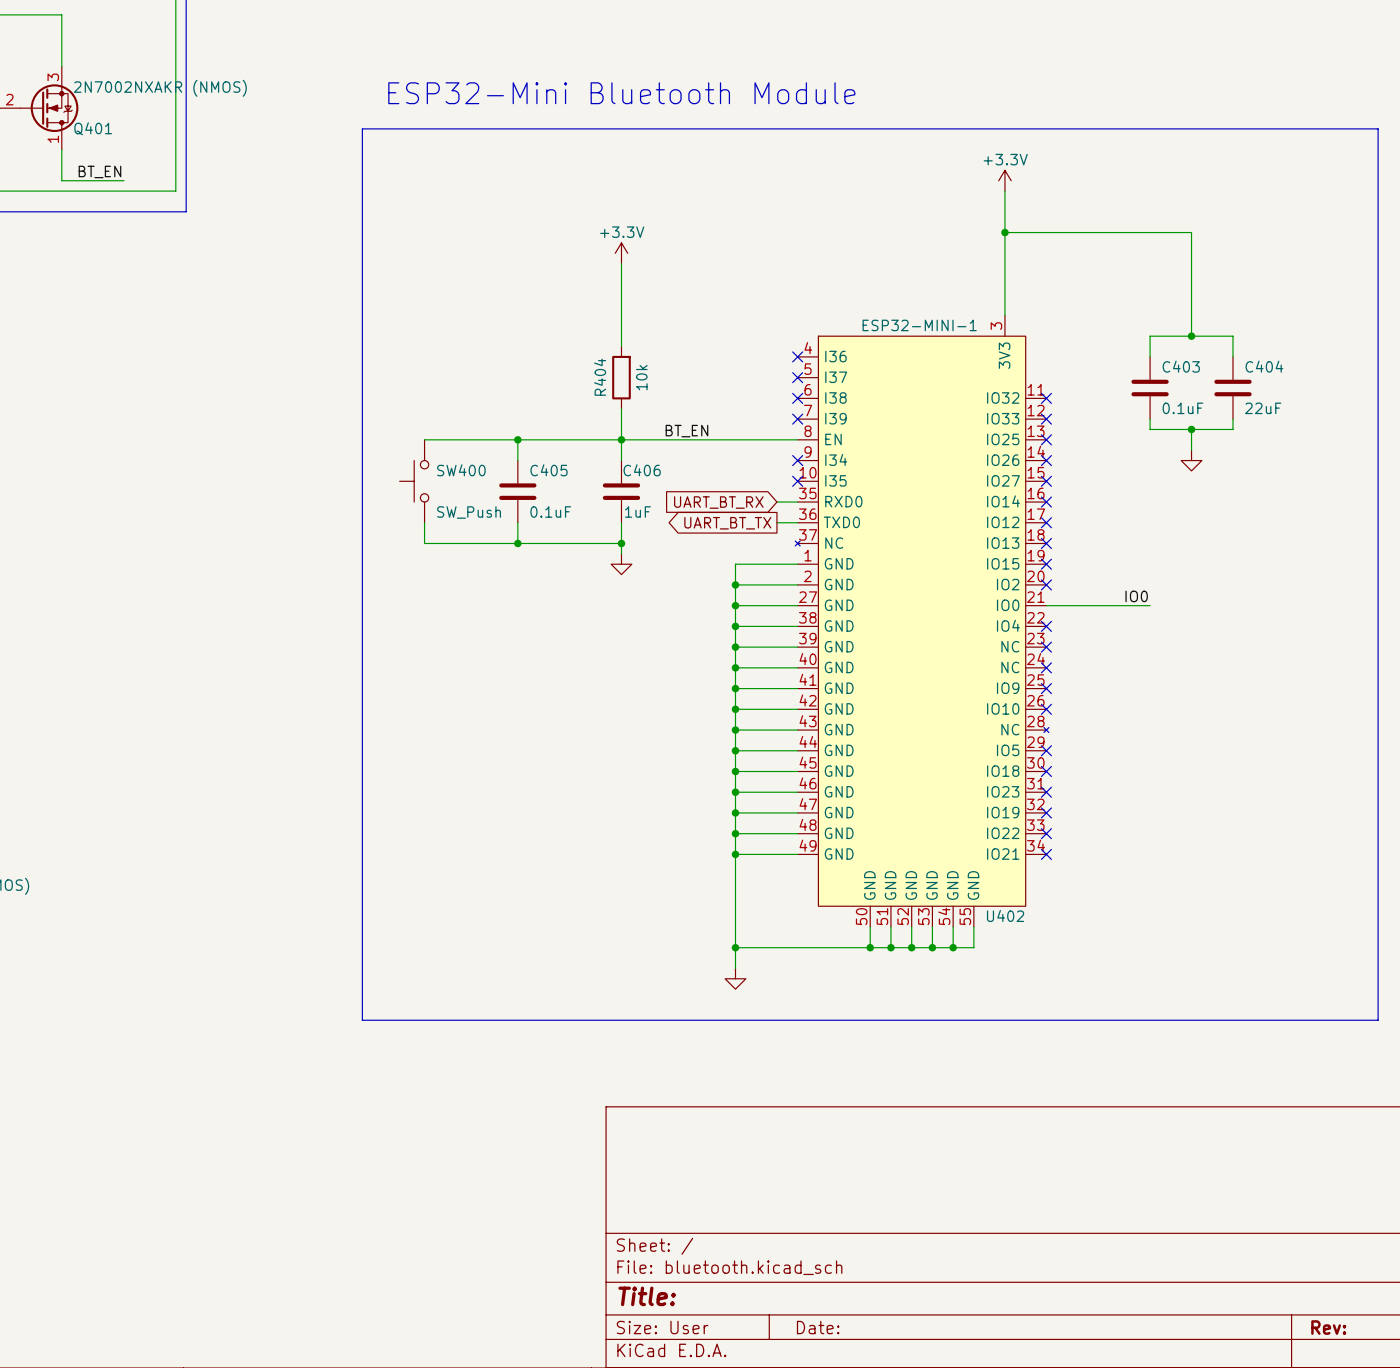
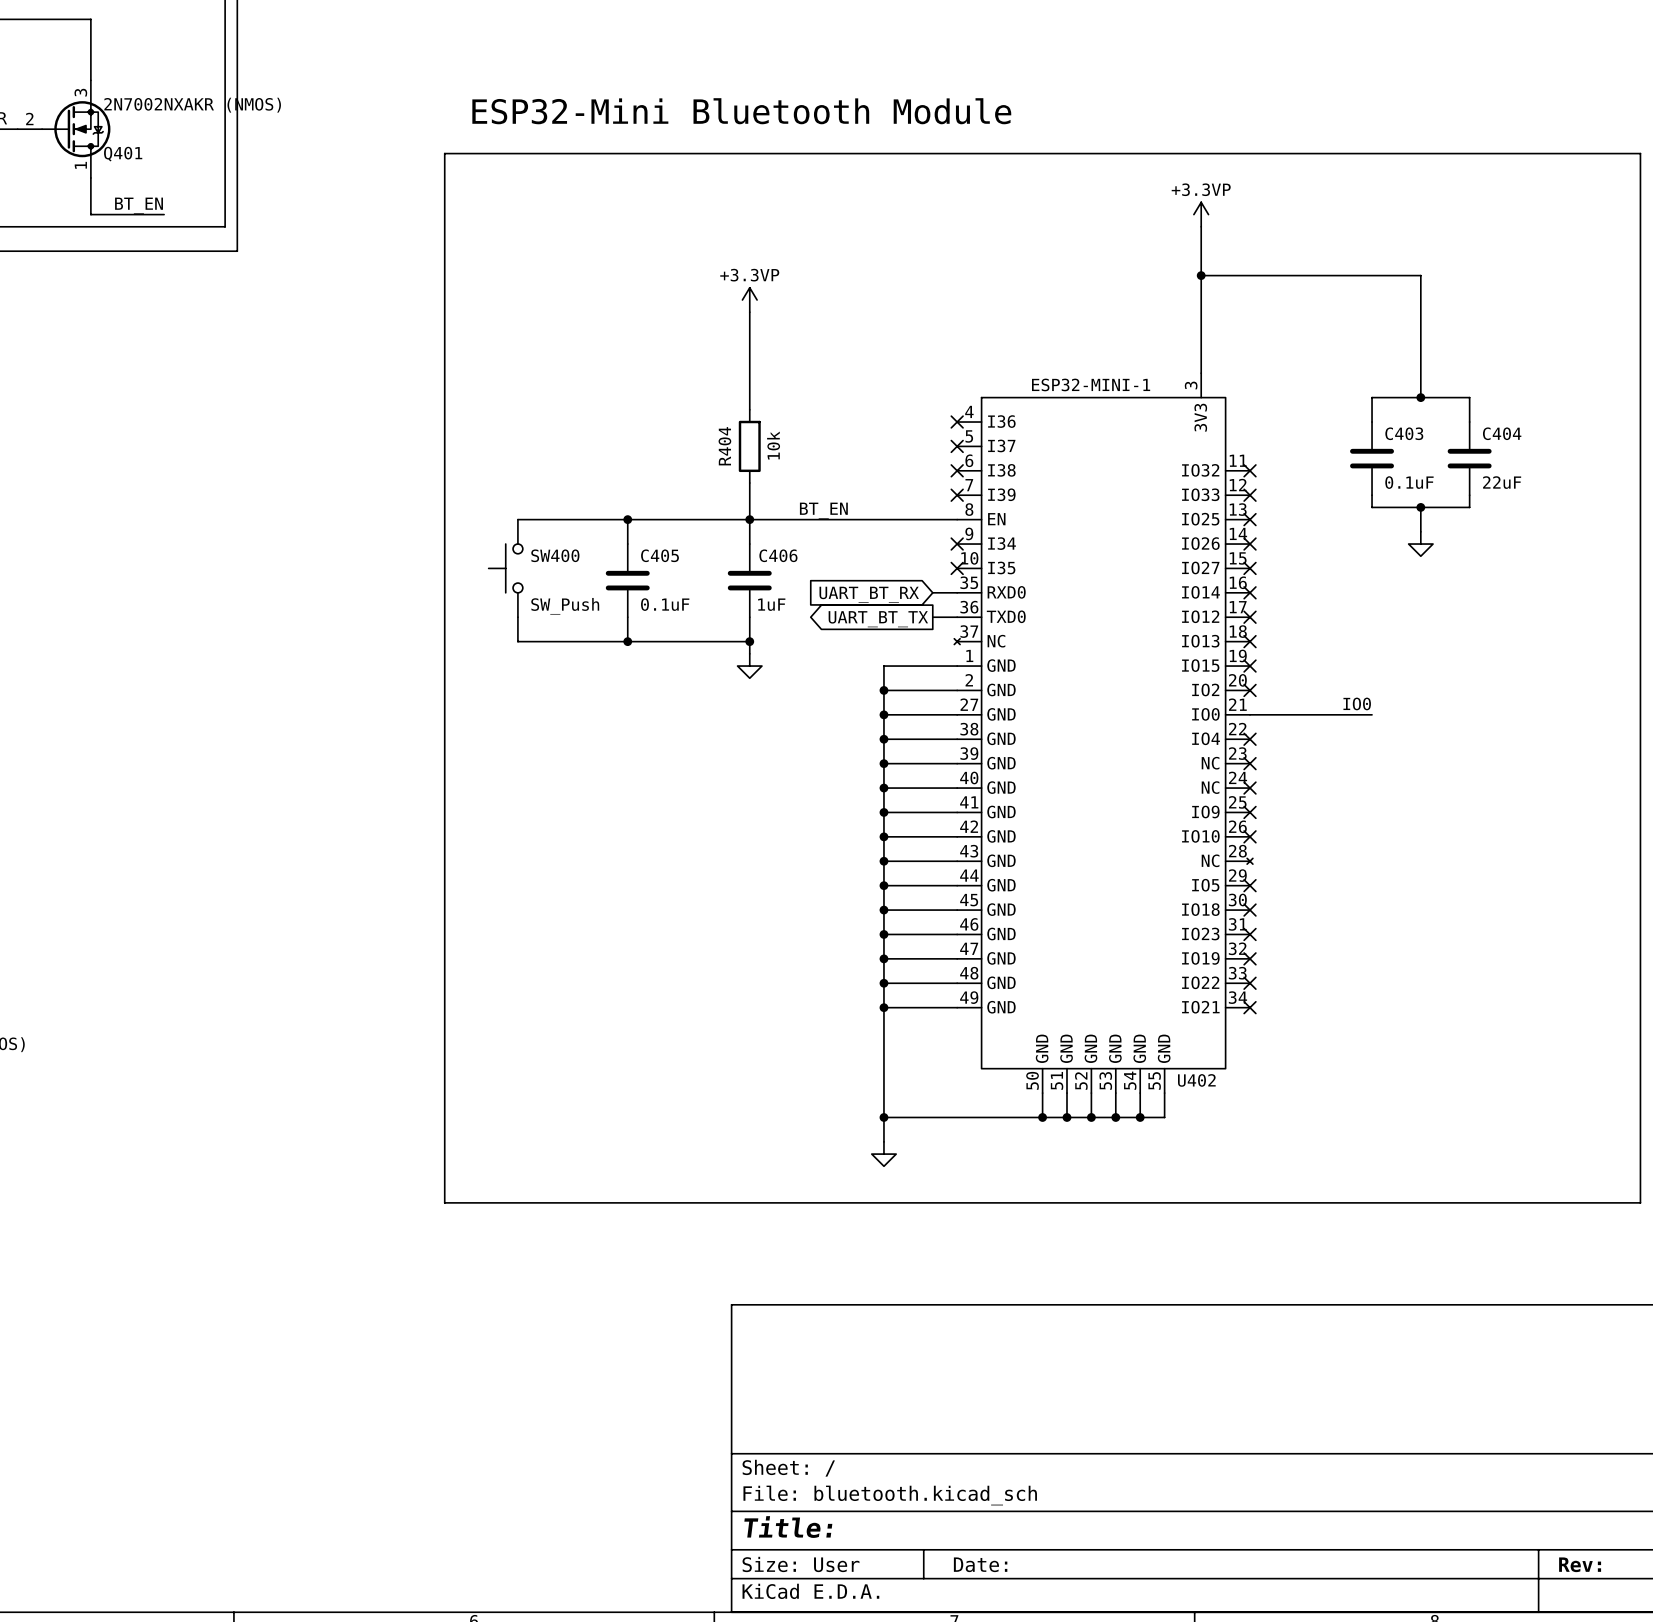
power symbol: +3.3V (1004, 180) -> +3.3VP (1201, 214)
power symbol: +3.3V (621, 253) -> +3.3VP (749, 300)

